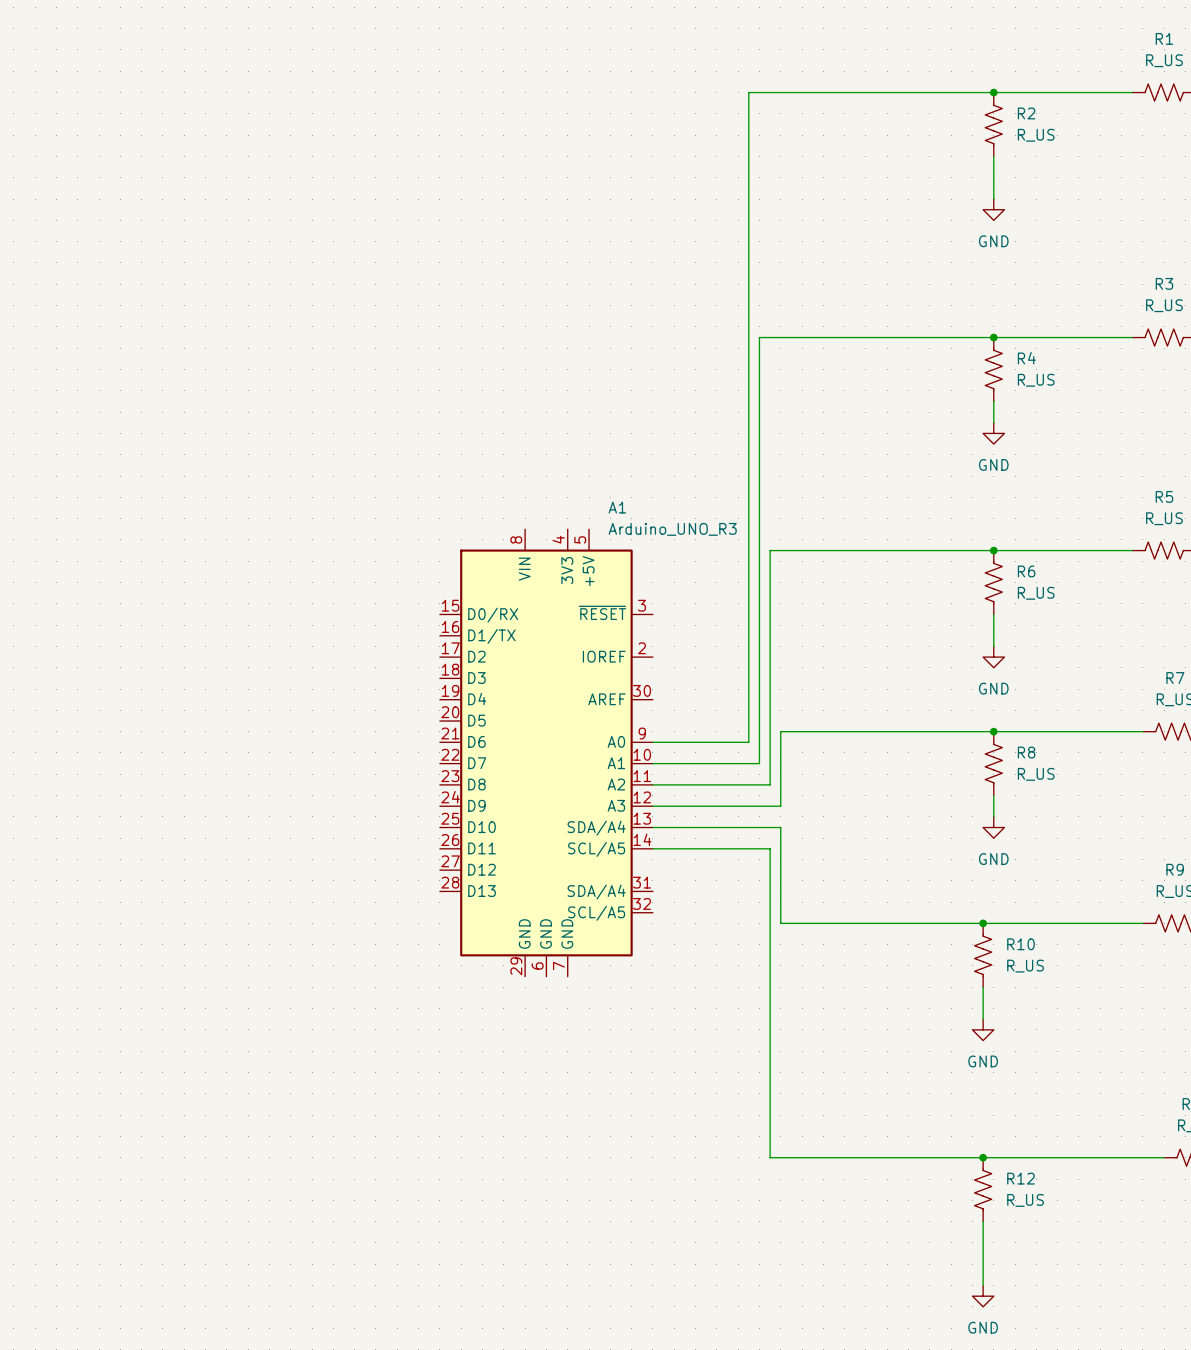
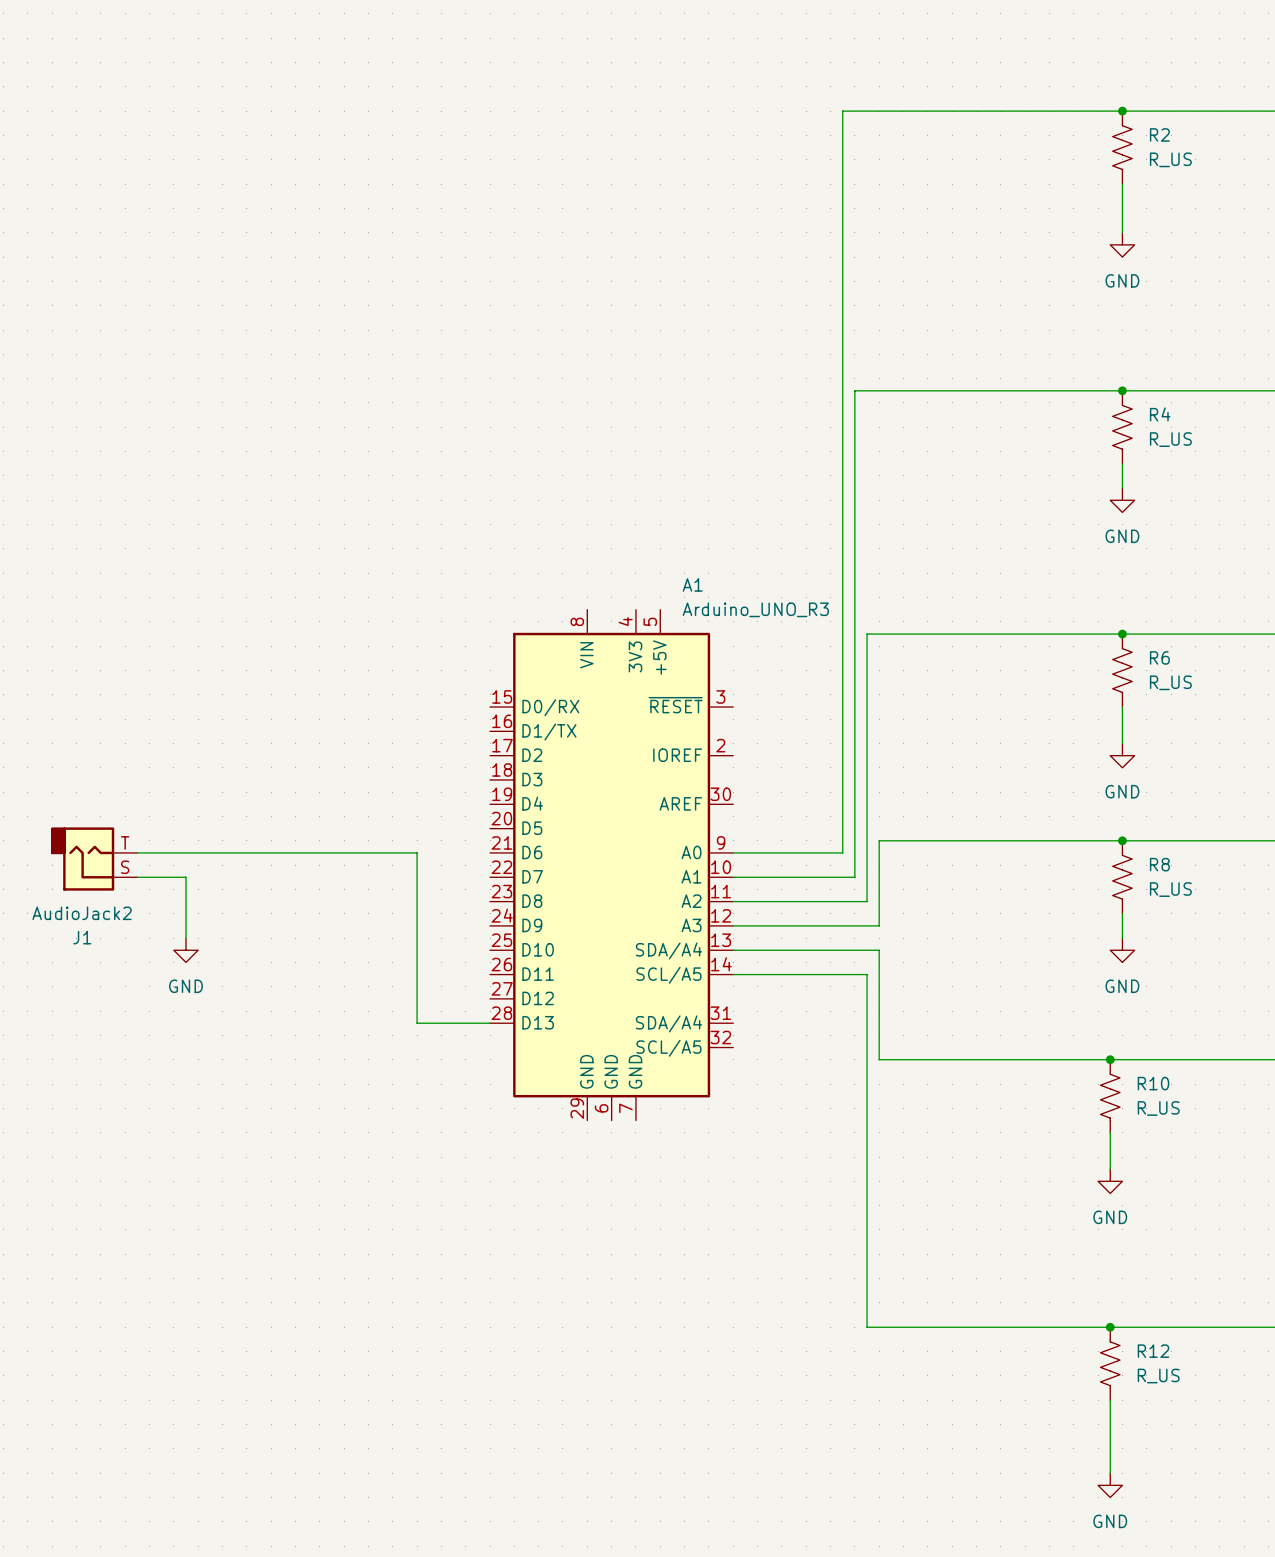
wire: none -> (137, 852) (417, 852) (417, 1023) (490, 1023)
J1: none -> AudioJack2 (94, 859)
wire: none -> (137, 877) (185, 877) (185, 938)
power symbol: none -> GND (185, 950)

